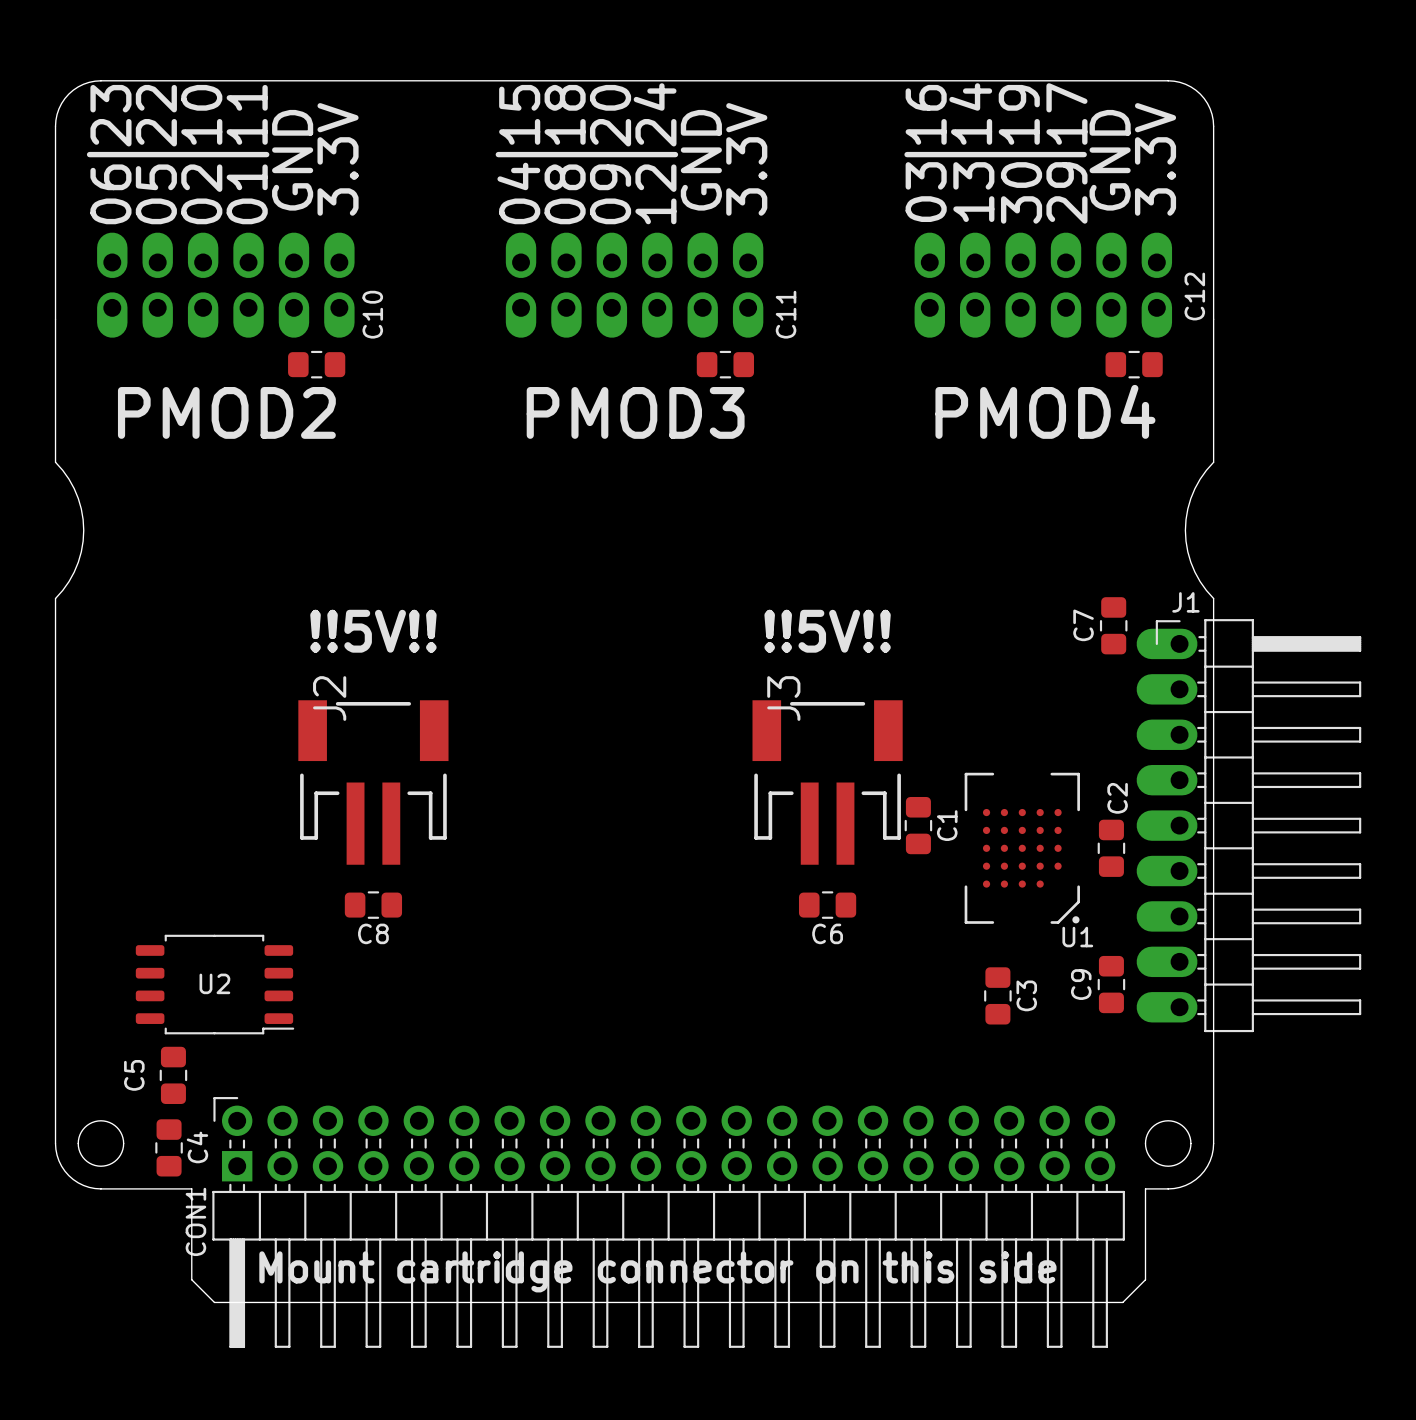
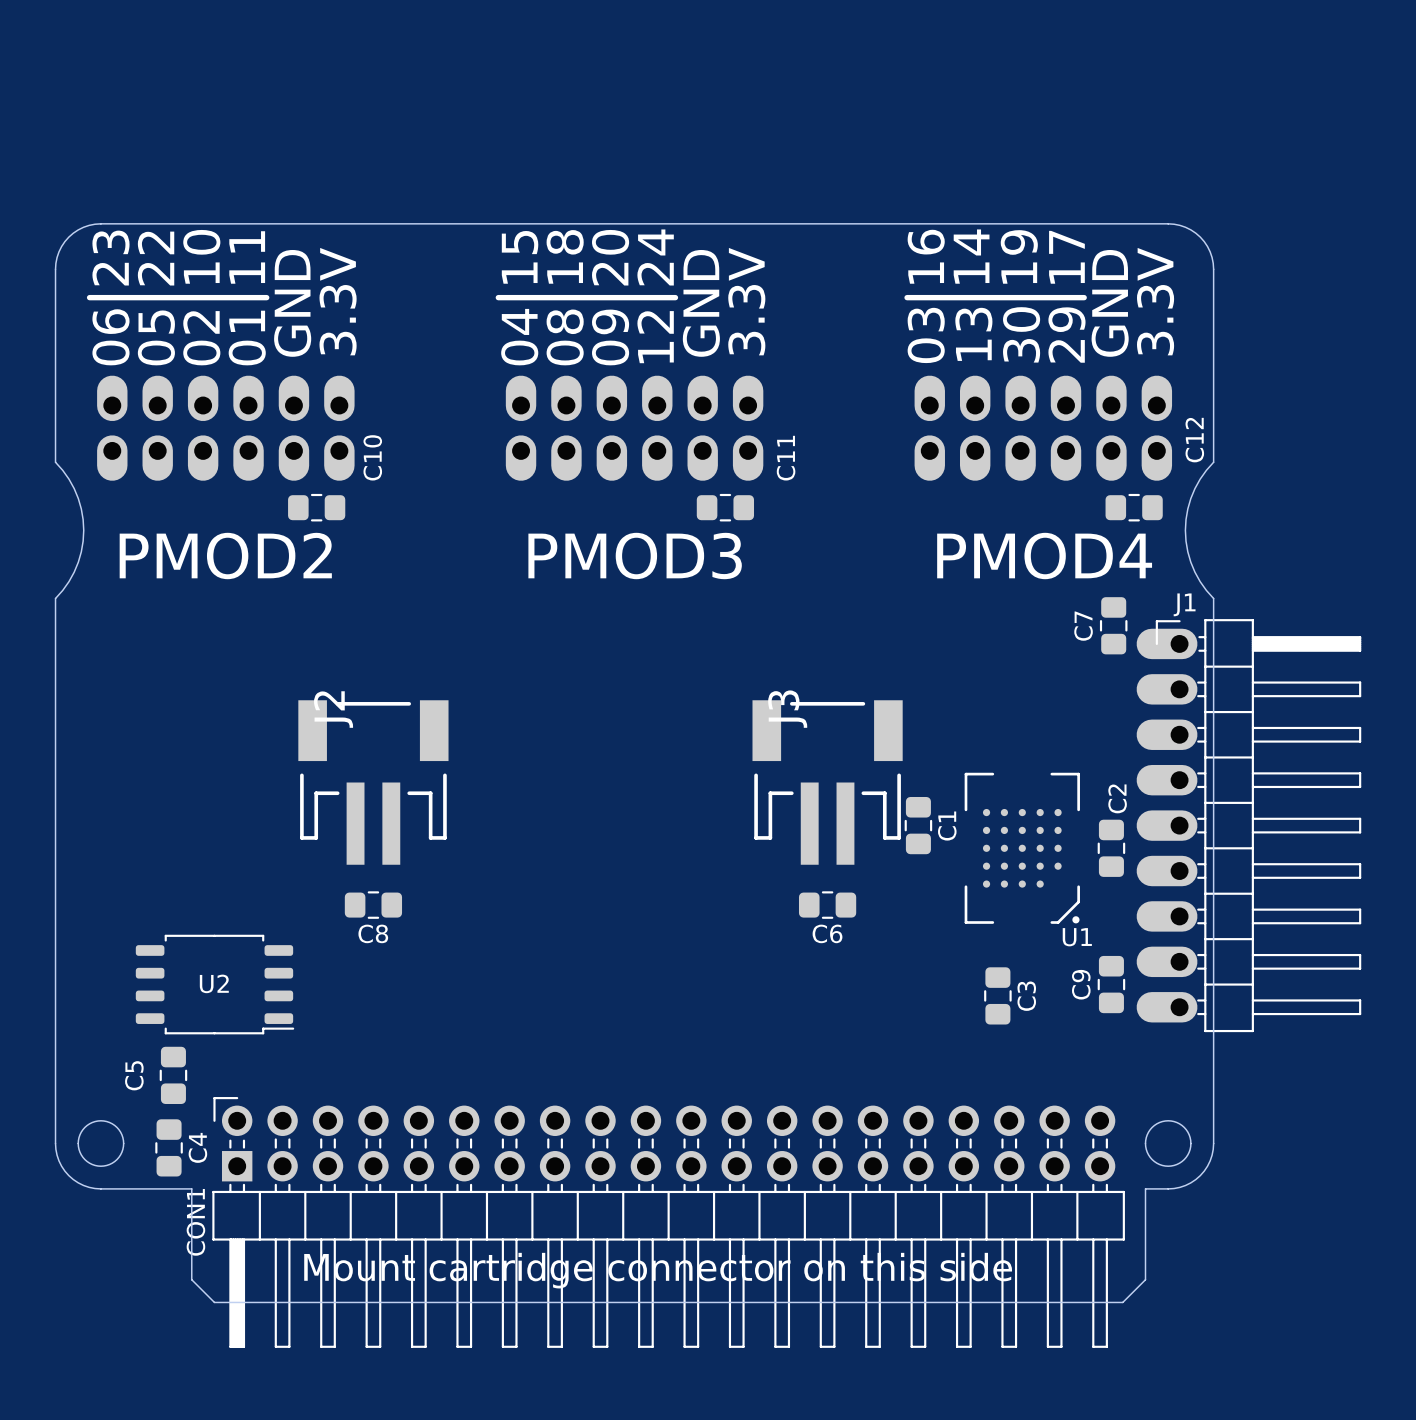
text position: 10 (201, 114) -> 10 (201, 256)
text position: 11 (247, 114) -> 11 (247, 257)
text position: 15 (519, 114) -> 15 (520, 257)
text position: 18 (565, 114) -> 18 (565, 256)
text position: 24 (655, 114) -> 24 (655, 257)
text position: 16 (926, 114) -> 16 (926, 256)
text position: 14 (970, 114) -> 14 (971, 256)
text position: 19 (1019, 114) -> 19 (1019, 256)
text position: 17 (1066, 114) -> 17 (1066, 257)
text position: 23 (110, 115) -> 23 (110, 258)
text position: 22 (156, 115) -> 22 (156, 258)
text position: 20 (610, 115) -> 20 (610, 257)
line: (89, 154) (266, 154) -> (89, 297) (266, 297)
line: (498, 154) (675, 154) -> (498, 297) (675, 297)
line: (907, 154) (1084, 154) -> (907, 297) (1084, 297)
text position: 3.3V (338, 159) -> 3.3V (338, 301)
text position: 3.3V (746, 159) -> 3.3V (746, 301)
text position: 3.3V (1155, 159) -> 3.3V (1155, 301)
text position: GND (292, 160) -> GND (292, 303)
text position: GND (701, 160) -> GND (701, 303)
text position: GND (1110, 160) -> GND (1110, 303)
text position: 03 (926, 192) -> 03 (926, 335)
text position: 13 (973, 192) -> 13 (973, 334)
text position: 30 (1021, 192) -> 30 (1021, 334)
text position: 29 (1066, 192) -> 29 (1066, 335)
text position: 04 (518, 193) -> 04 (519, 337)
text position: 06 (110, 194) -> 06 (110, 337)
text position: 05 (156, 194) -> 05 (156, 337)
text position: 02 (201, 194) -> 02 (201, 338)
text position: 01 (247, 194) -> 01 (247, 338)
text position: 08 (565, 194) -> 08 (565, 337)
text position: 09 (610, 194) -> 09 (610, 337)
text position: 12 (655, 194) -> 12 (655, 337)
board edge: (55, 269) (57, 114) (64, 98) (73, 90) (83, 84) (100, 80) (1174, 81) (1185, 84) (1195, 90) (1207, 103) (1212, 114) (1213, 269) -> (55, 269) (58, 251) (68, 237) (83, 227) (100, 223) (1168, 223) (1185, 227) (1200, 237) (1210, 251) (1213, 269)
PMOD2 position: (225, 285) -> (225, 428)
PMOD3 position: (634, 285) -> (634, 428)
PMOD4 position: (1043, 285) -> (1043, 428)
C10 position: (316, 364) -> (316, 507)
C11 position: (725, 364) -> (725, 507)
C12 position: (1134, 364) -> (1134, 507)
text: !!5V!! (373, 631) -> none
text: !!5V!! (827, 631) -> none

